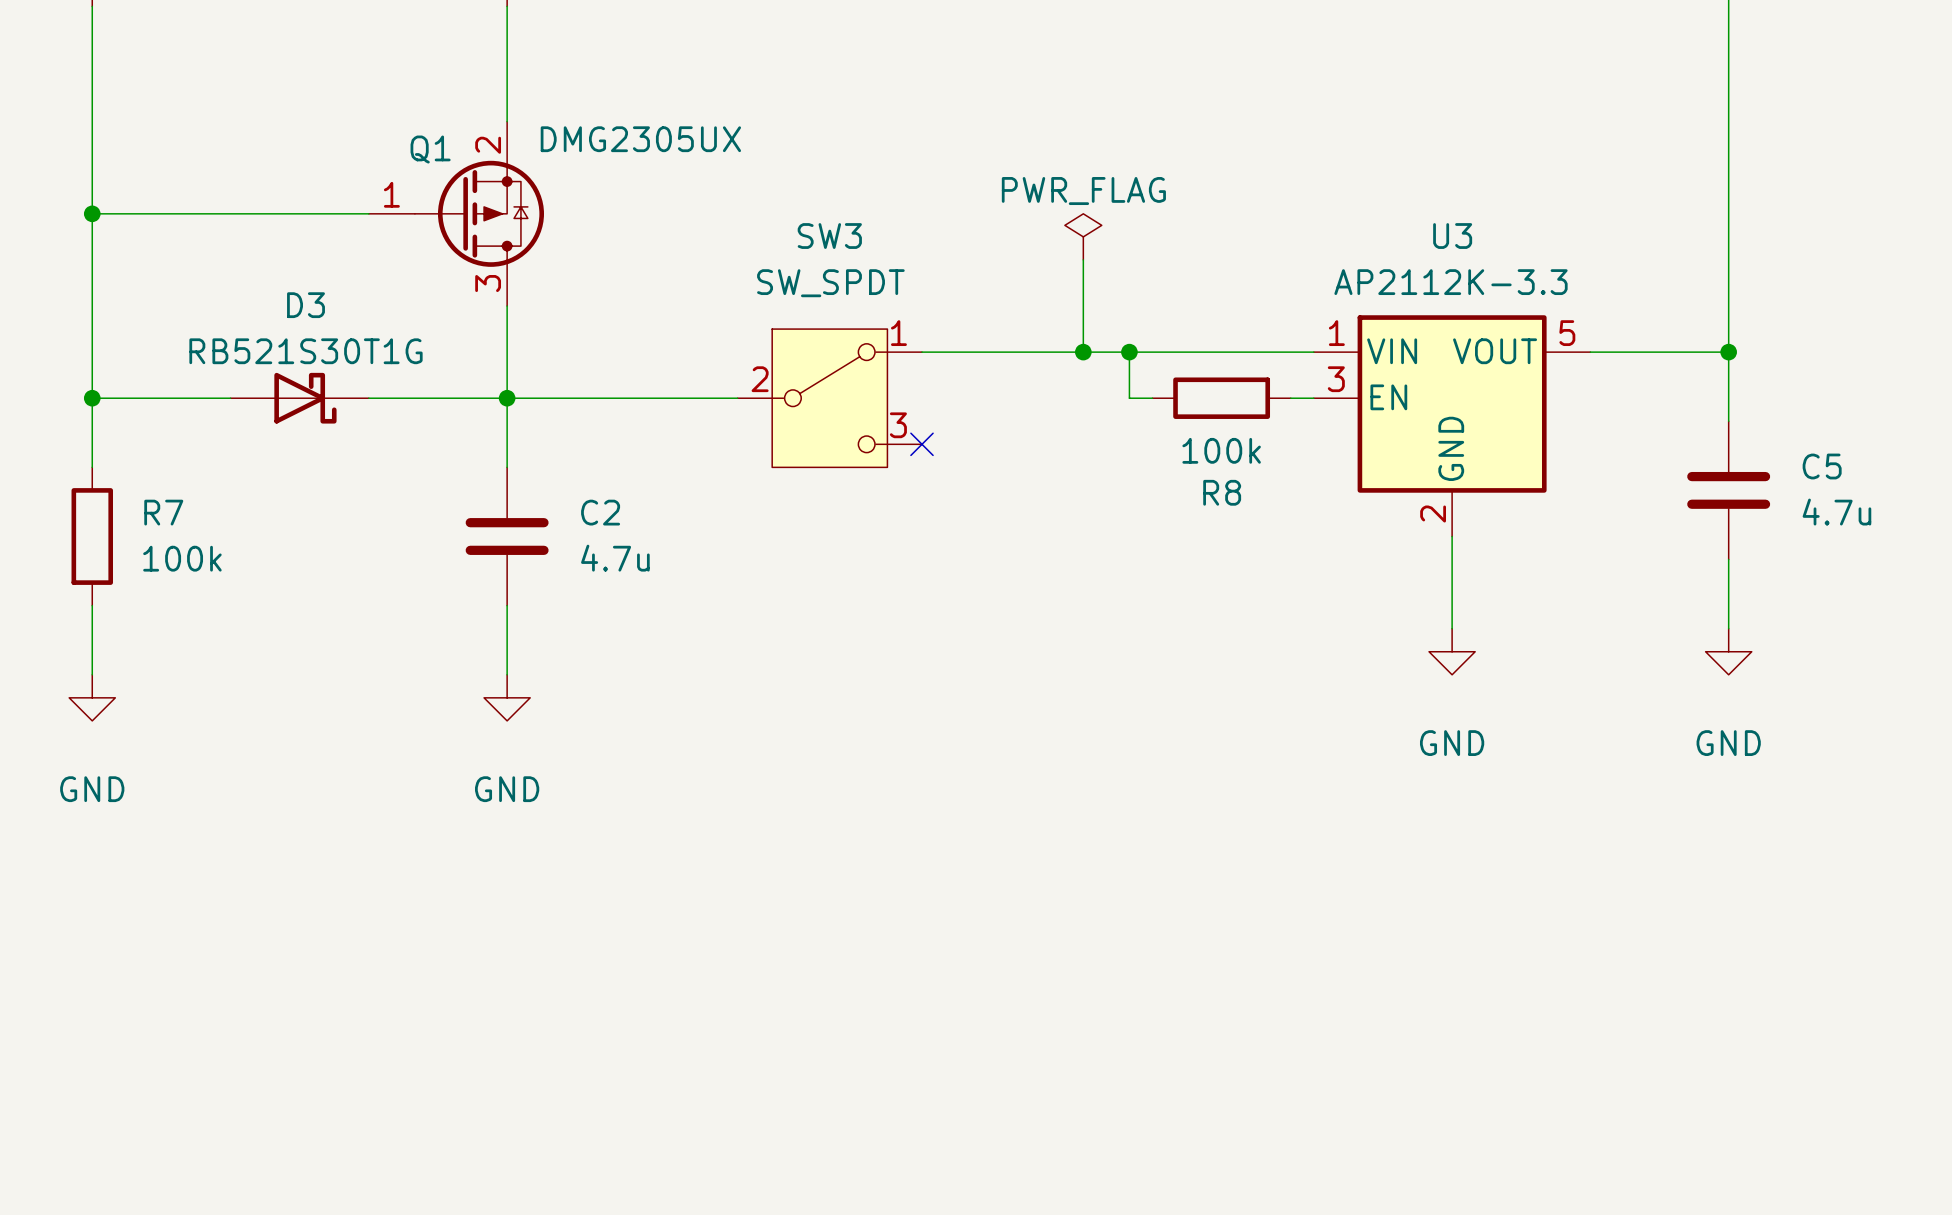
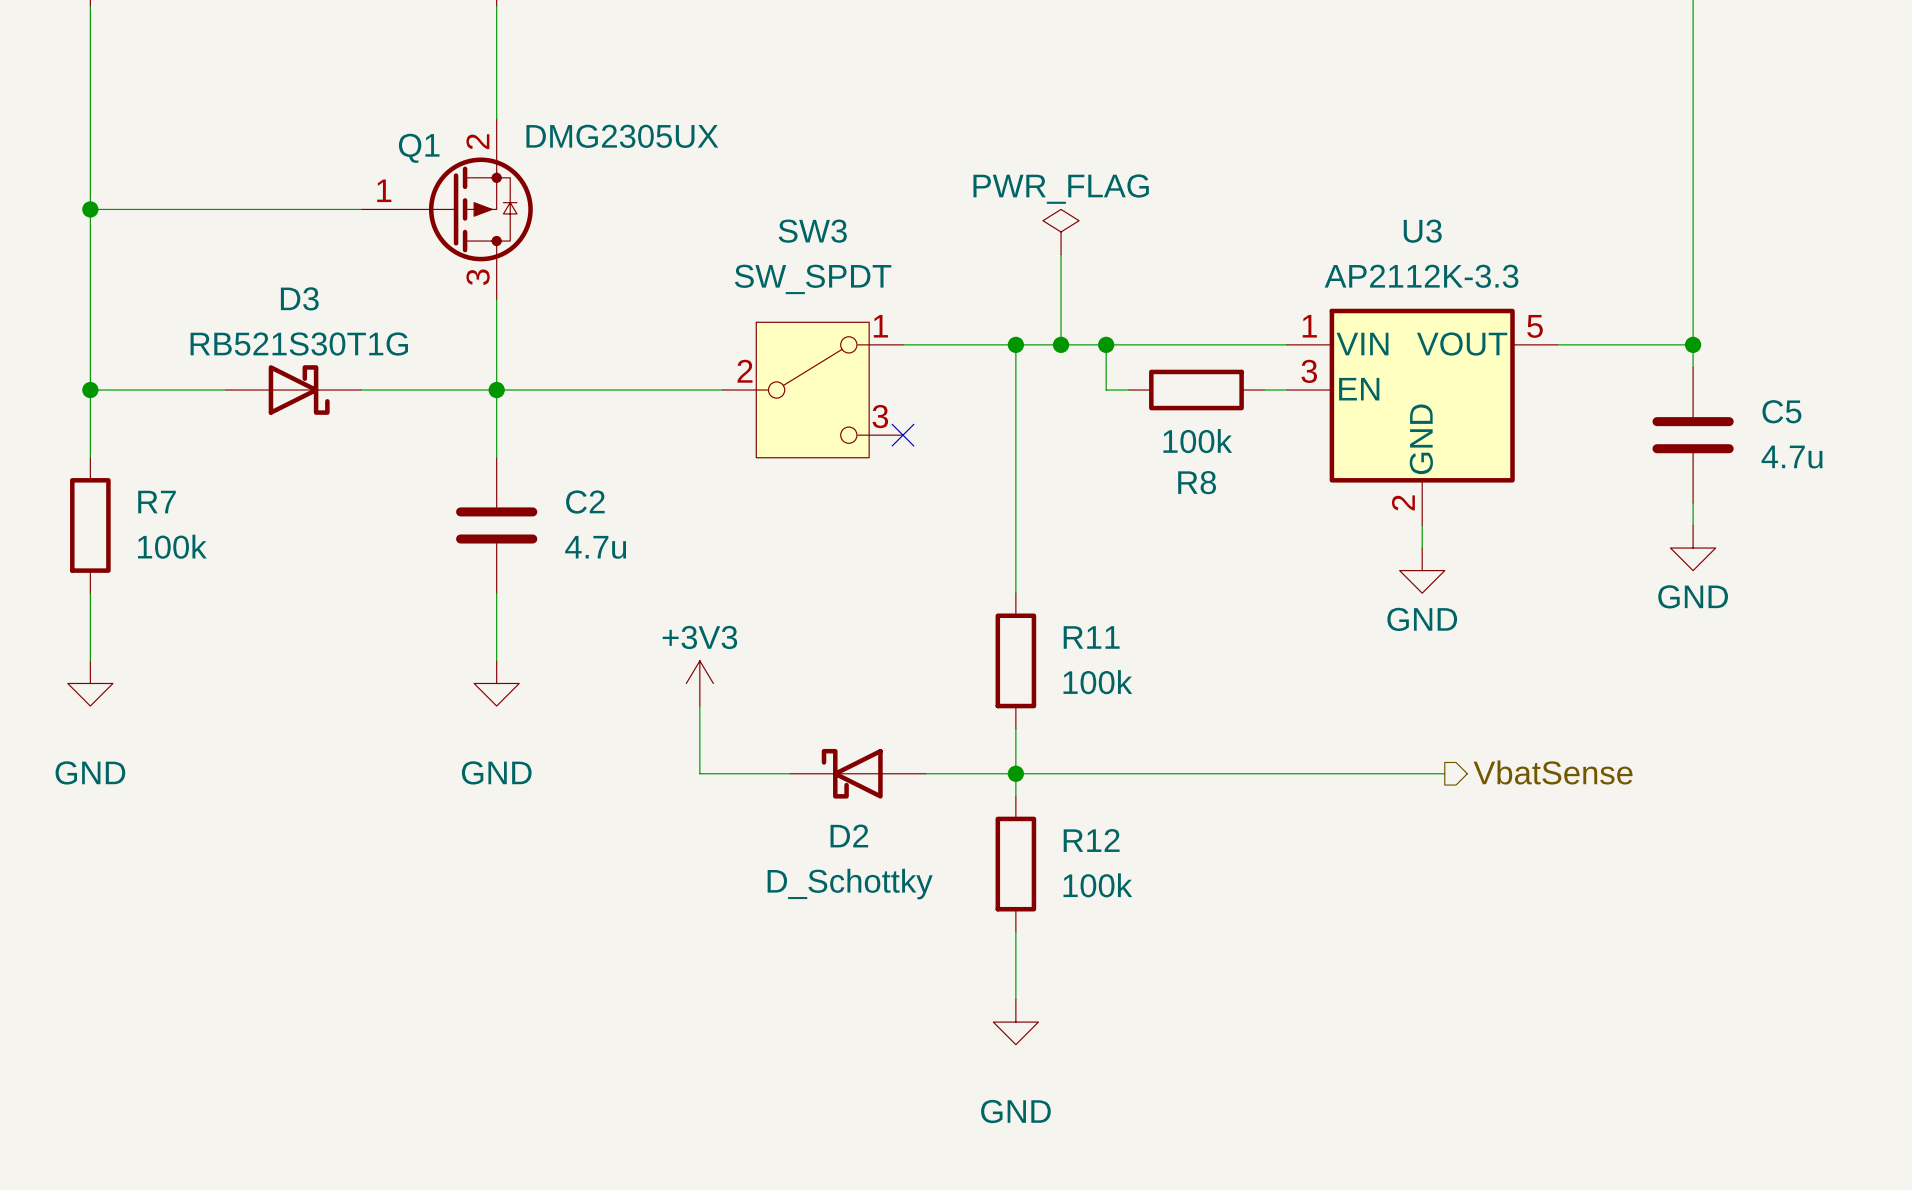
wire: none -> (1015, 344) (1015, 593)
junction: none -> (1015, 344)
C5 position: (1728, 490) -> (1693, 435)
wire: (1452, 559) (1452, 628) -> none
wire: (1728, 559) (1728, 628) -> none
power symbol position: GND (1452, 651) -> GND (1422, 570)
power symbol position: GND (1728, 651) -> GND (1693, 548)
R11: none -> 100k (1015, 660)
power symbol: none -> +3V3 (699, 683)
wire: none -> (699, 706) (699, 773) (790, 773)
wire: none -> (1015, 728) (1015, 796)
power symbol text position: GND (1452, 743) -> GND (1422, 619)
power symbol text position: GND (1728, 743) -> GND (1693, 596)
hierarchical label: none -> VbatSense (1553, 772)
D2: none -> D_Schottky (857, 773)
wire: none -> (925, 773) (1444, 773)
junction: none -> (1015, 773)
R12: none -> 100k (1015, 864)
wire: none -> (1015, 931) (1015, 999)
power symbol: none -> GND (1015, 1022)

